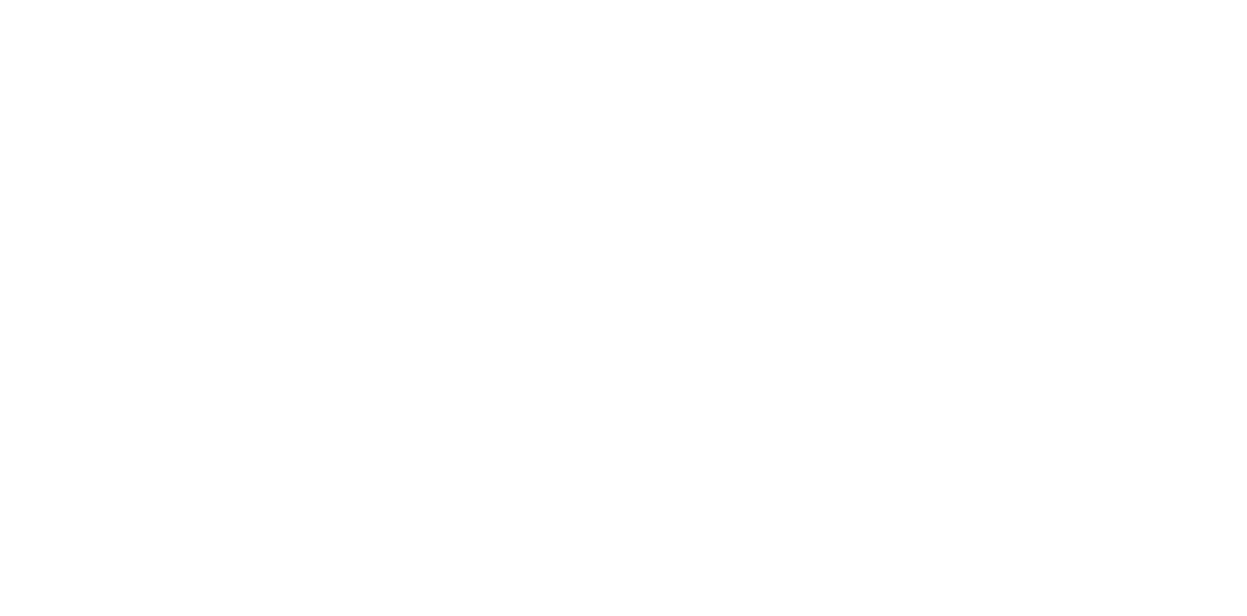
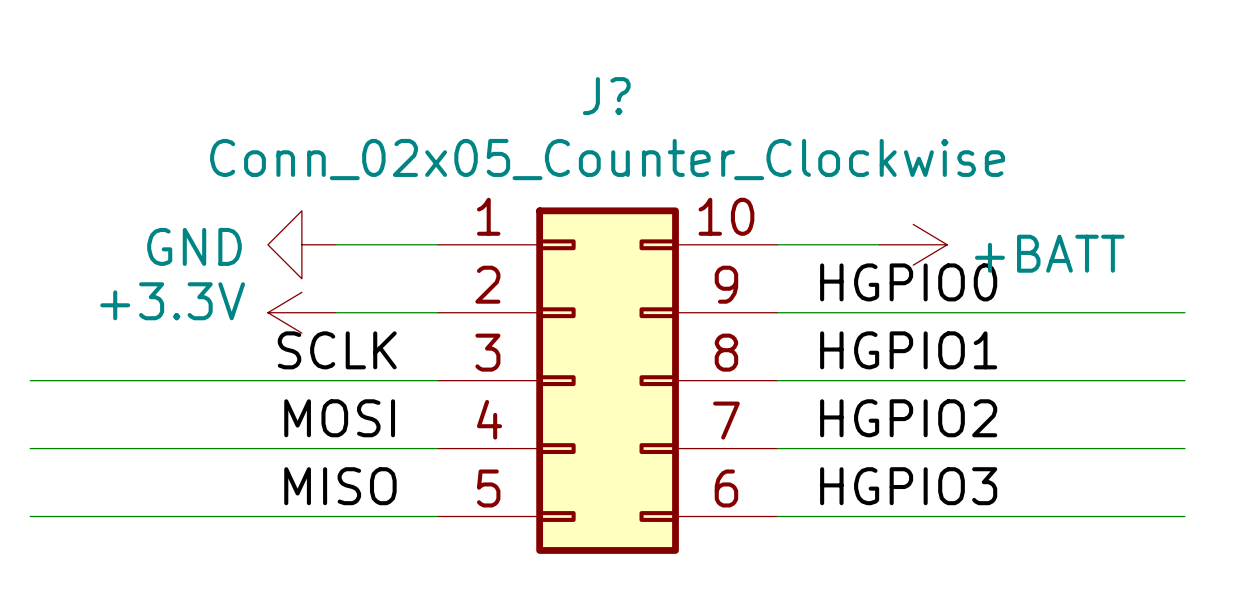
power symbol: none -> GND (301, 244)
wire: none -> (335, 244) (437, 244)
wire: none -> (777, 244) (879, 244)
power symbol: none -> +BATT (913, 244)
label: none -> HGPIO0 (908, 282)
power symbol: none -> +3.3V (301, 312)
wire: none -> (335, 312) (437, 312)
wire: none -> (777, 312) (1184, 312)
label: none -> SCLK (337, 350)
label: none -> HGPIO1 (908, 350)
wire: none -> (30, 380) (437, 380)
J?: none -> Conn_02x05_Counter_Clockwise (607, 380)
wire: none -> (777, 380) (1184, 380)
label: none -> MOSI (339, 418)
label: none -> HGPIO2 (908, 418)
wire: none -> (30, 448) (437, 448)
wire: none -> (777, 448) (1184, 448)
label: none -> MISO (340, 486)
label: none -> HGPIO3 (908, 486)
wire: none -> (30, 516) (437, 516)
wire: none -> (777, 516) (1184, 516)

